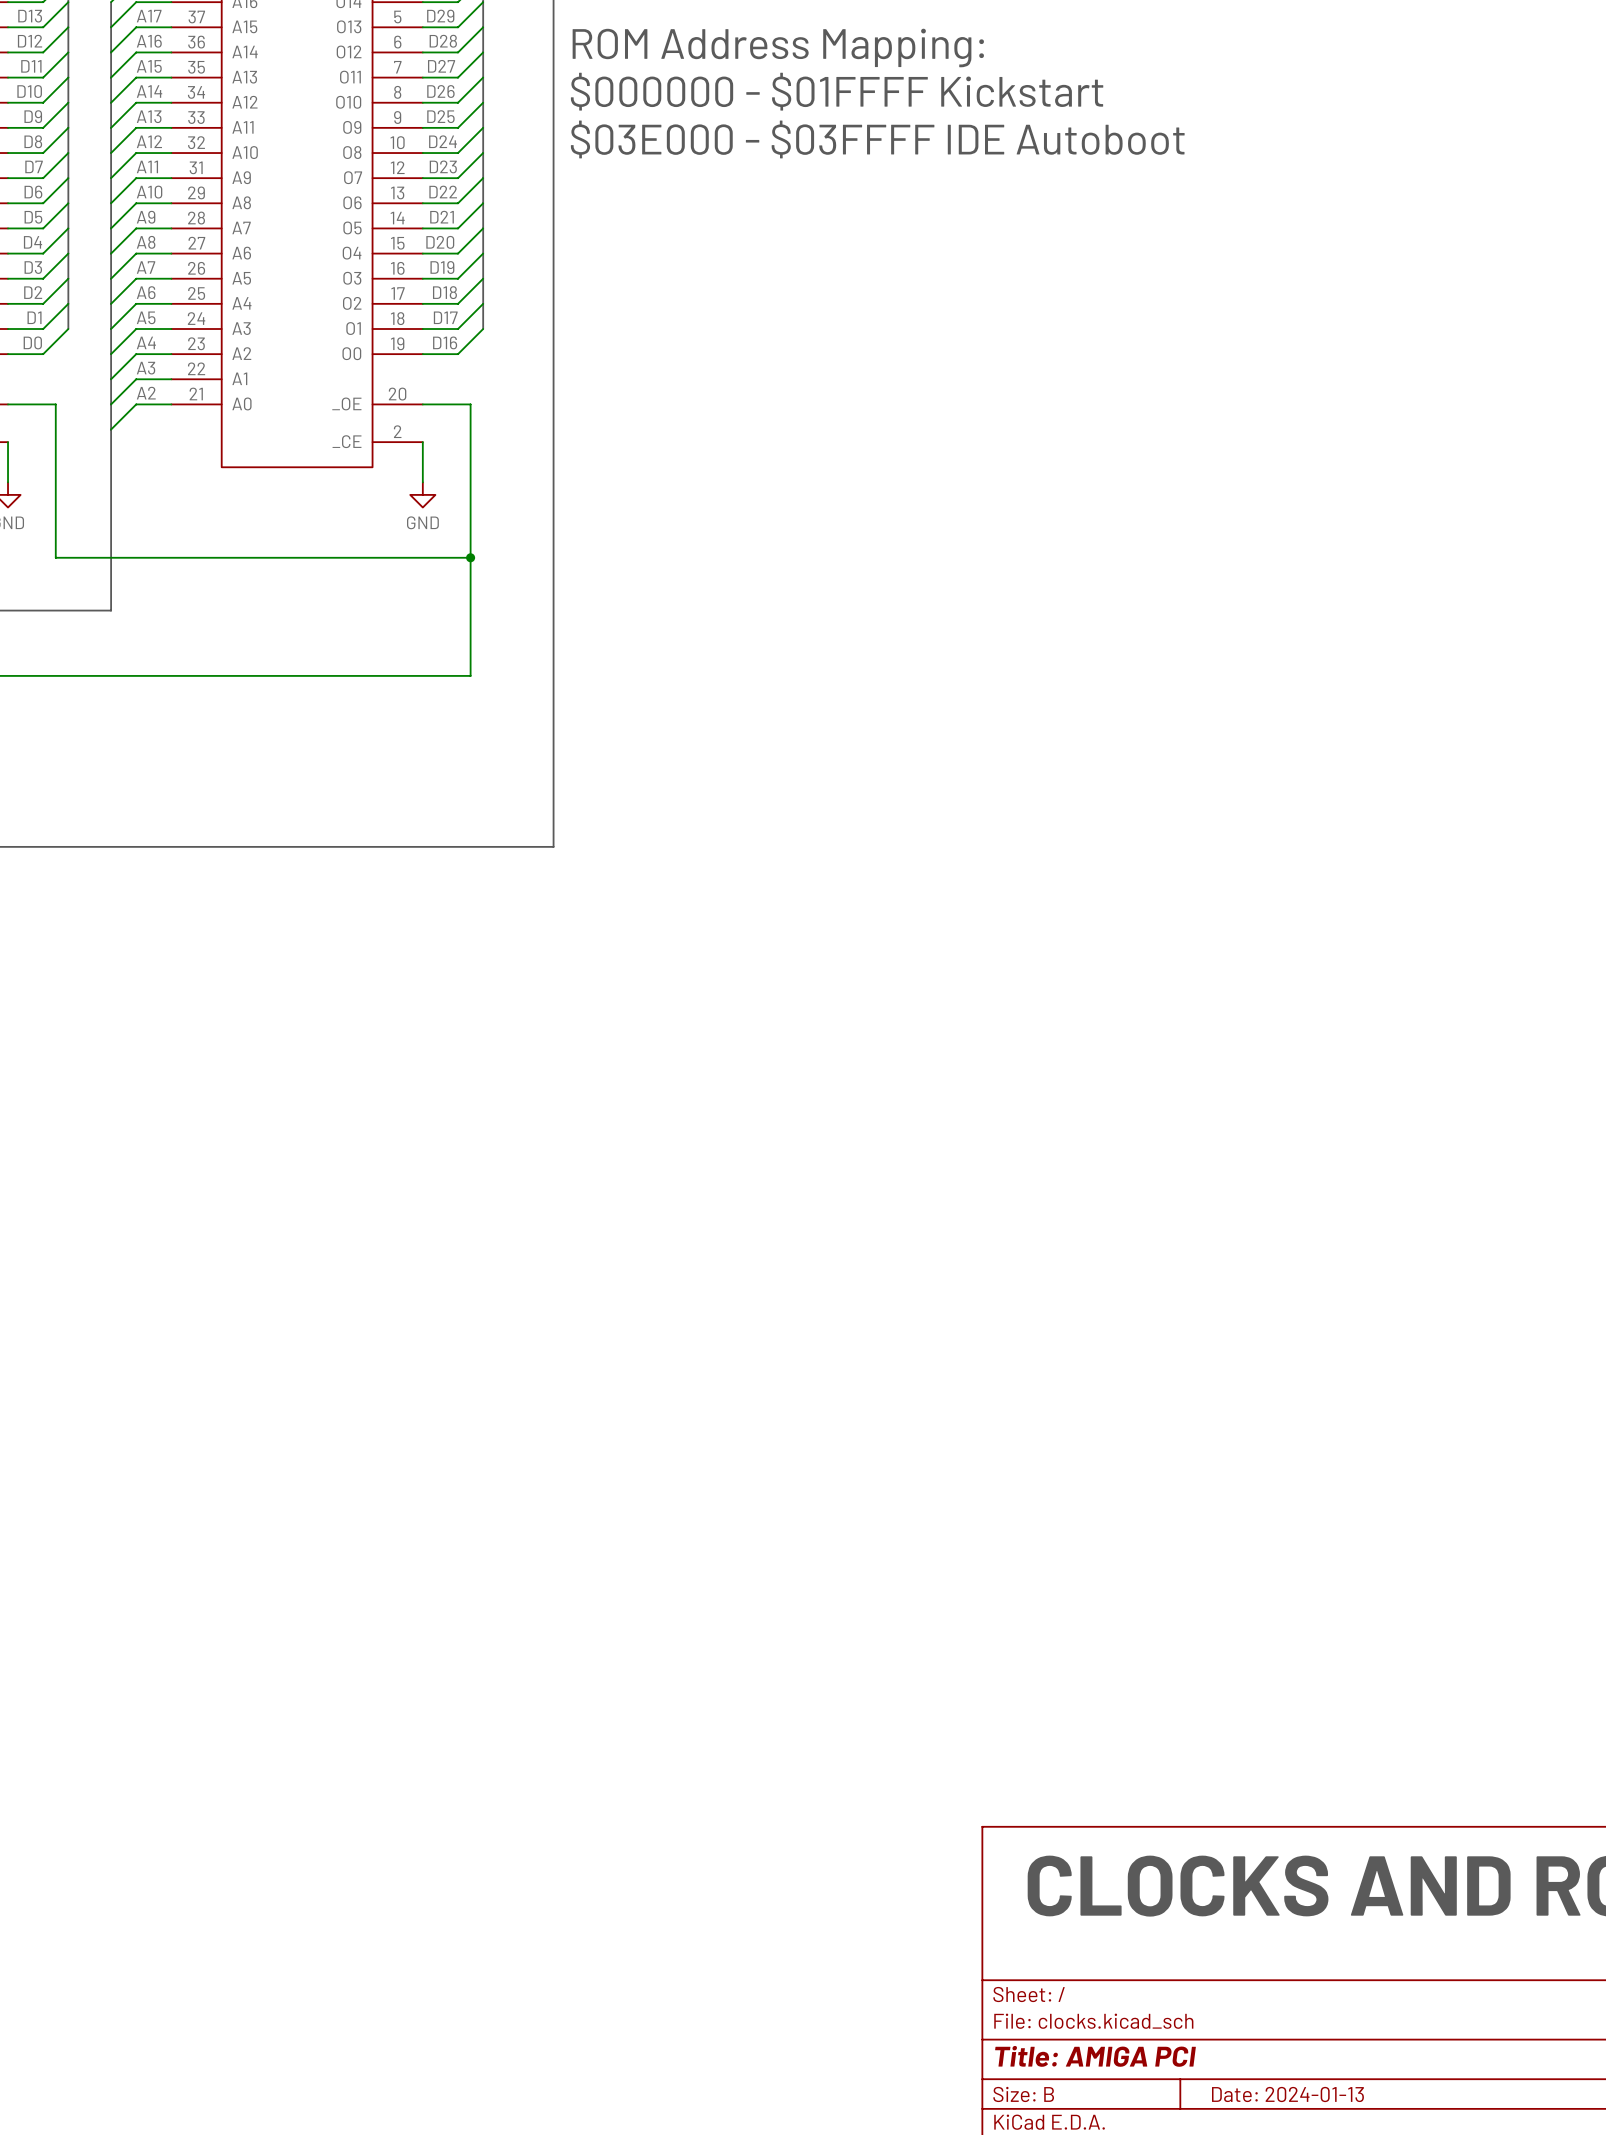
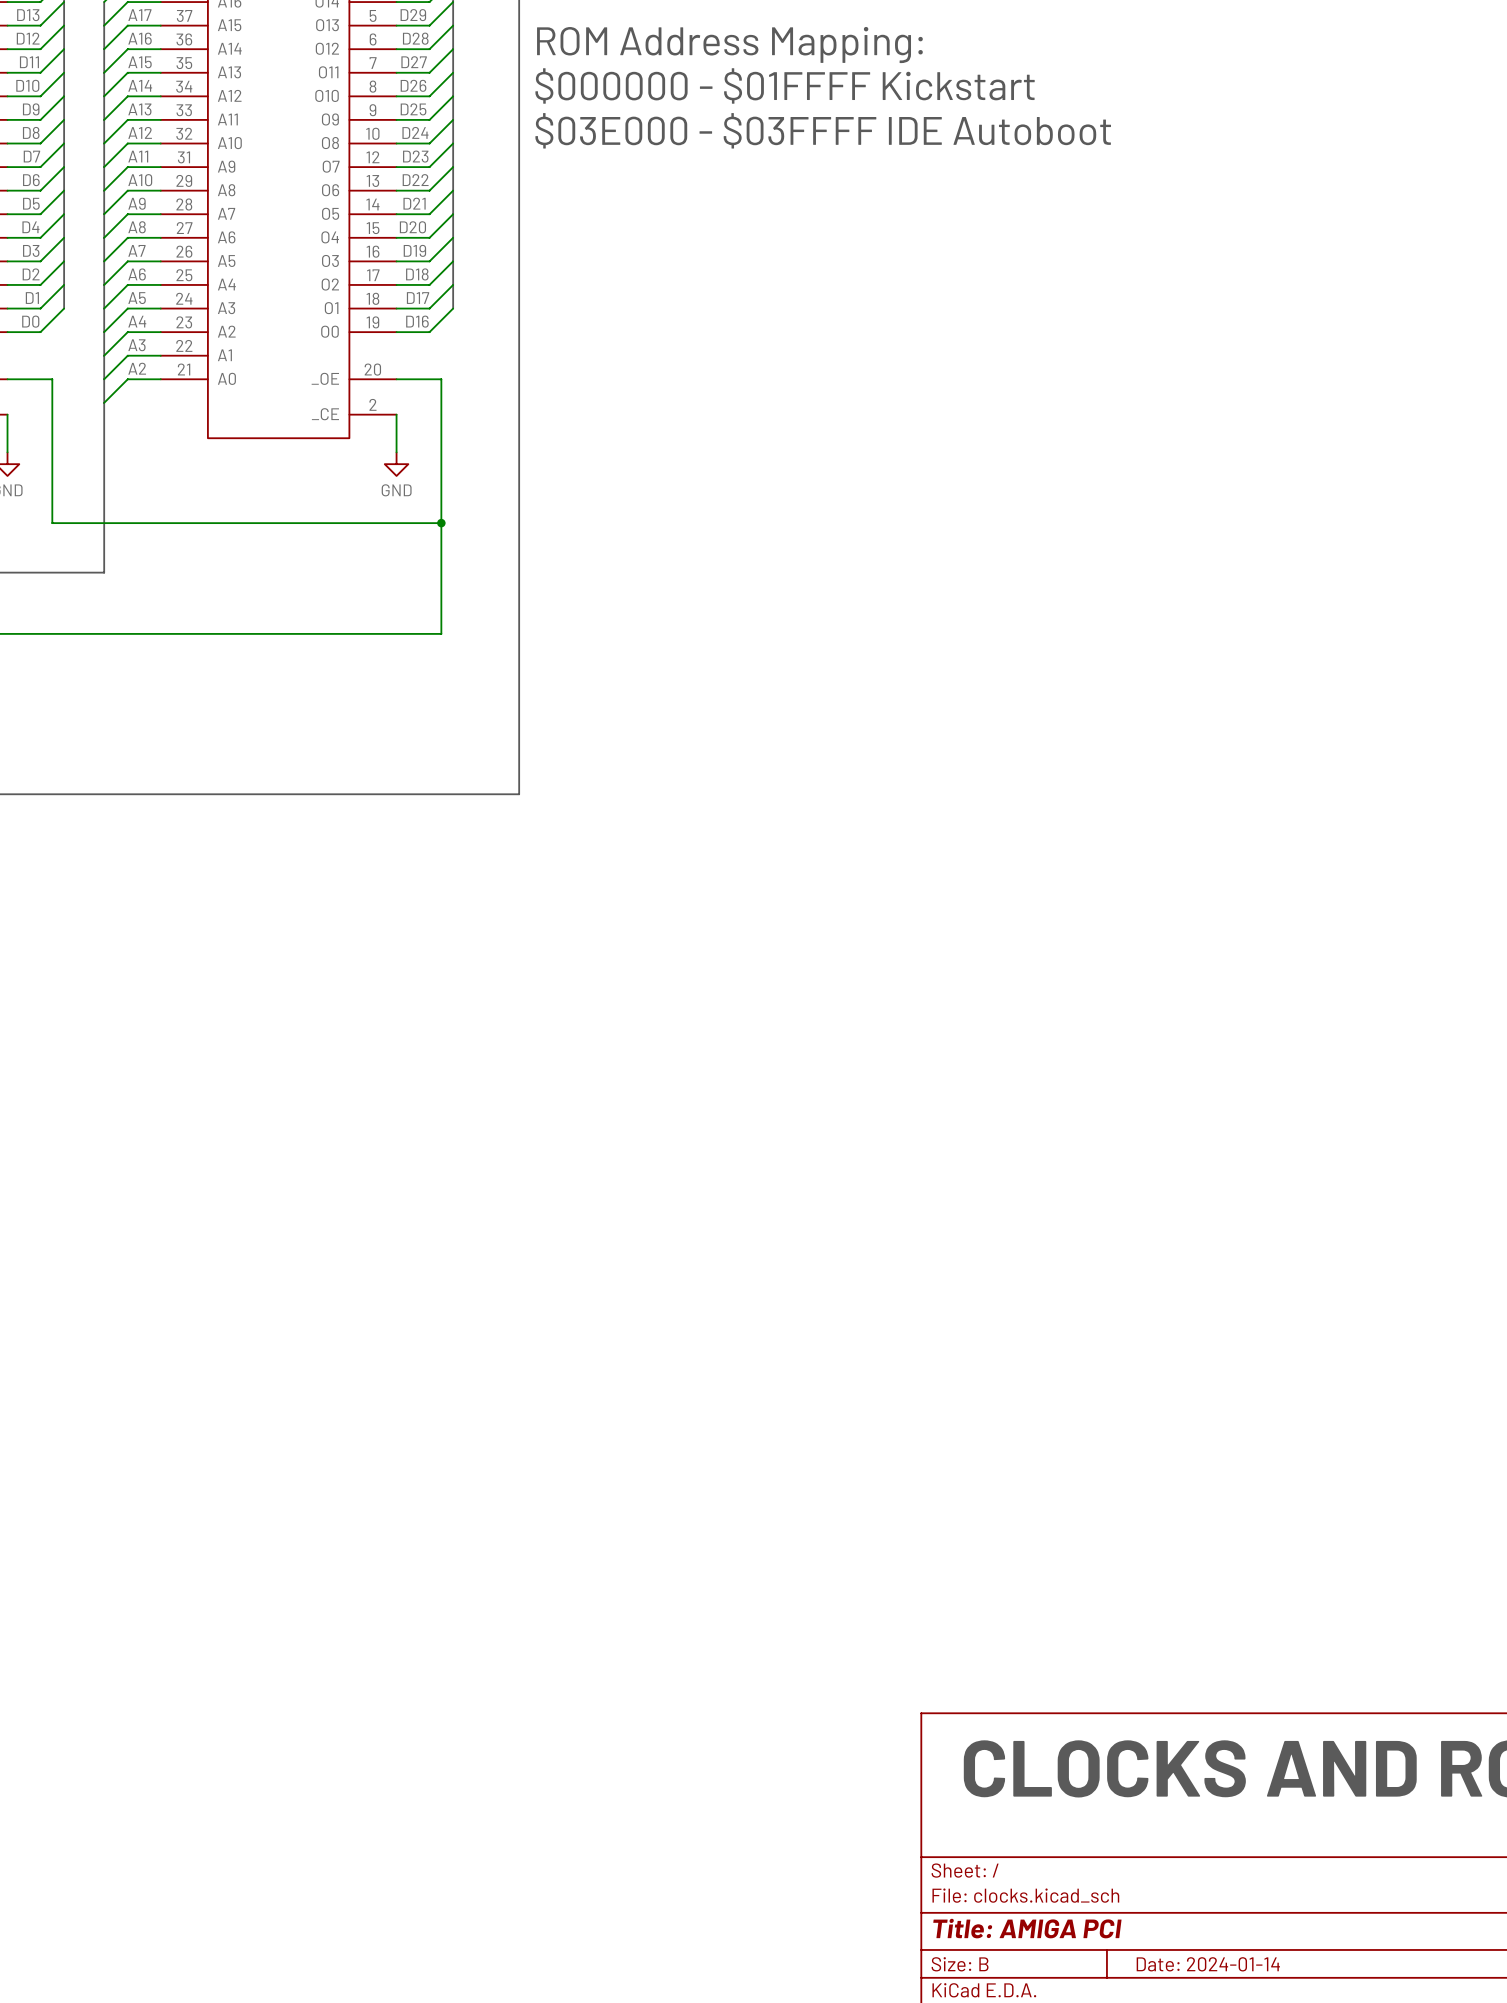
title block: Date: 2024-01-13 (1287, 2094) -> Date: 2024-01-14 (1208, 1964)

